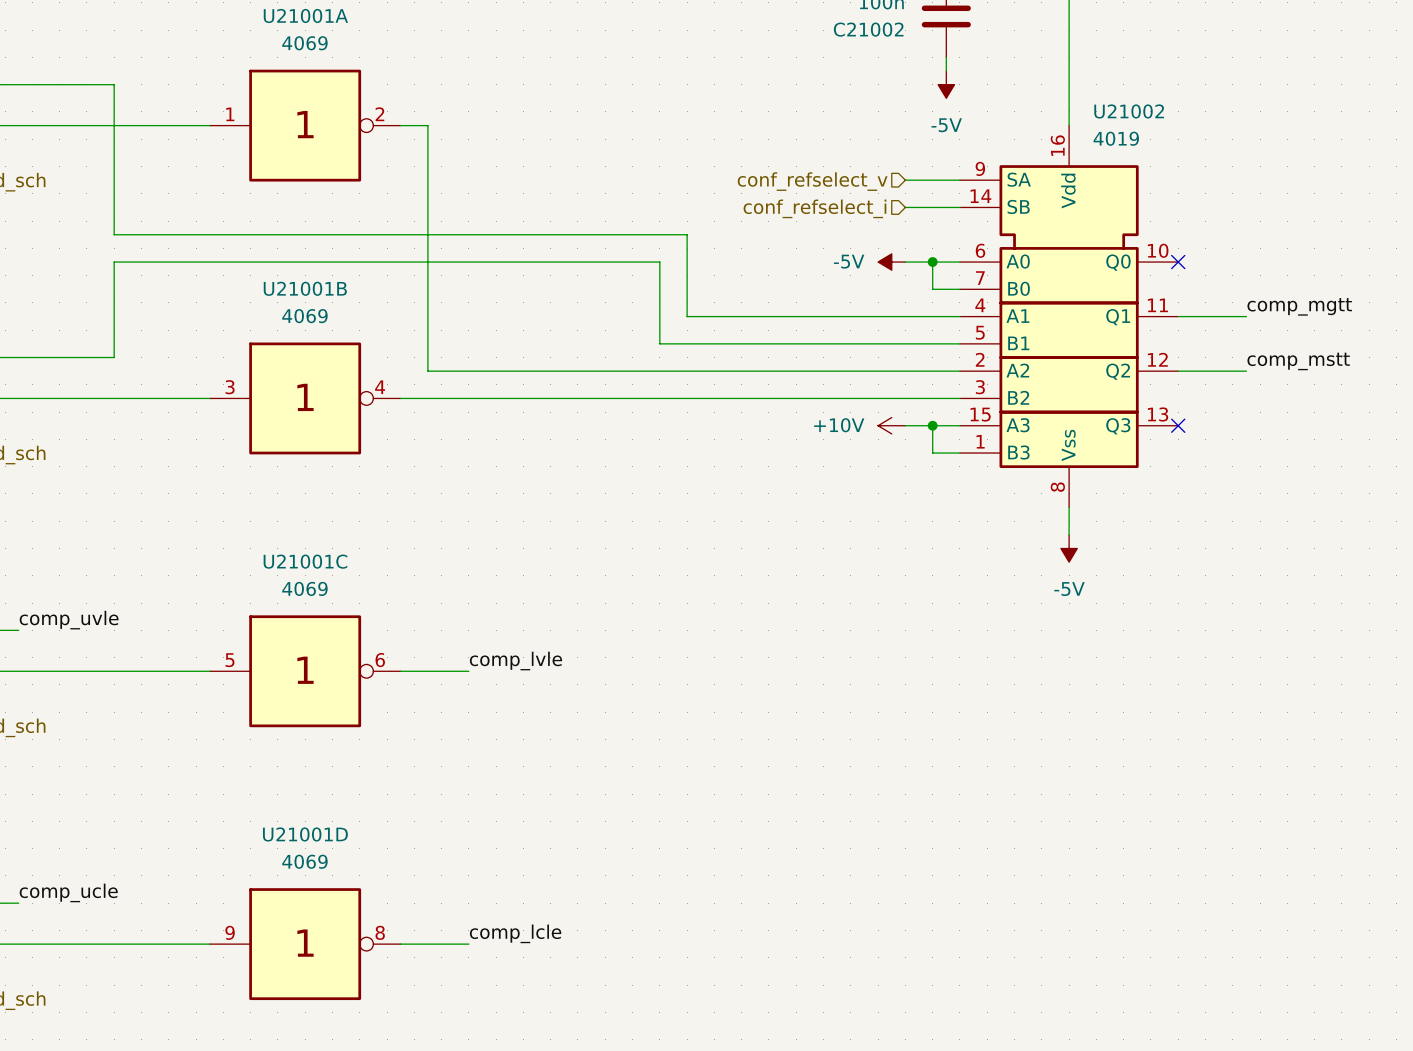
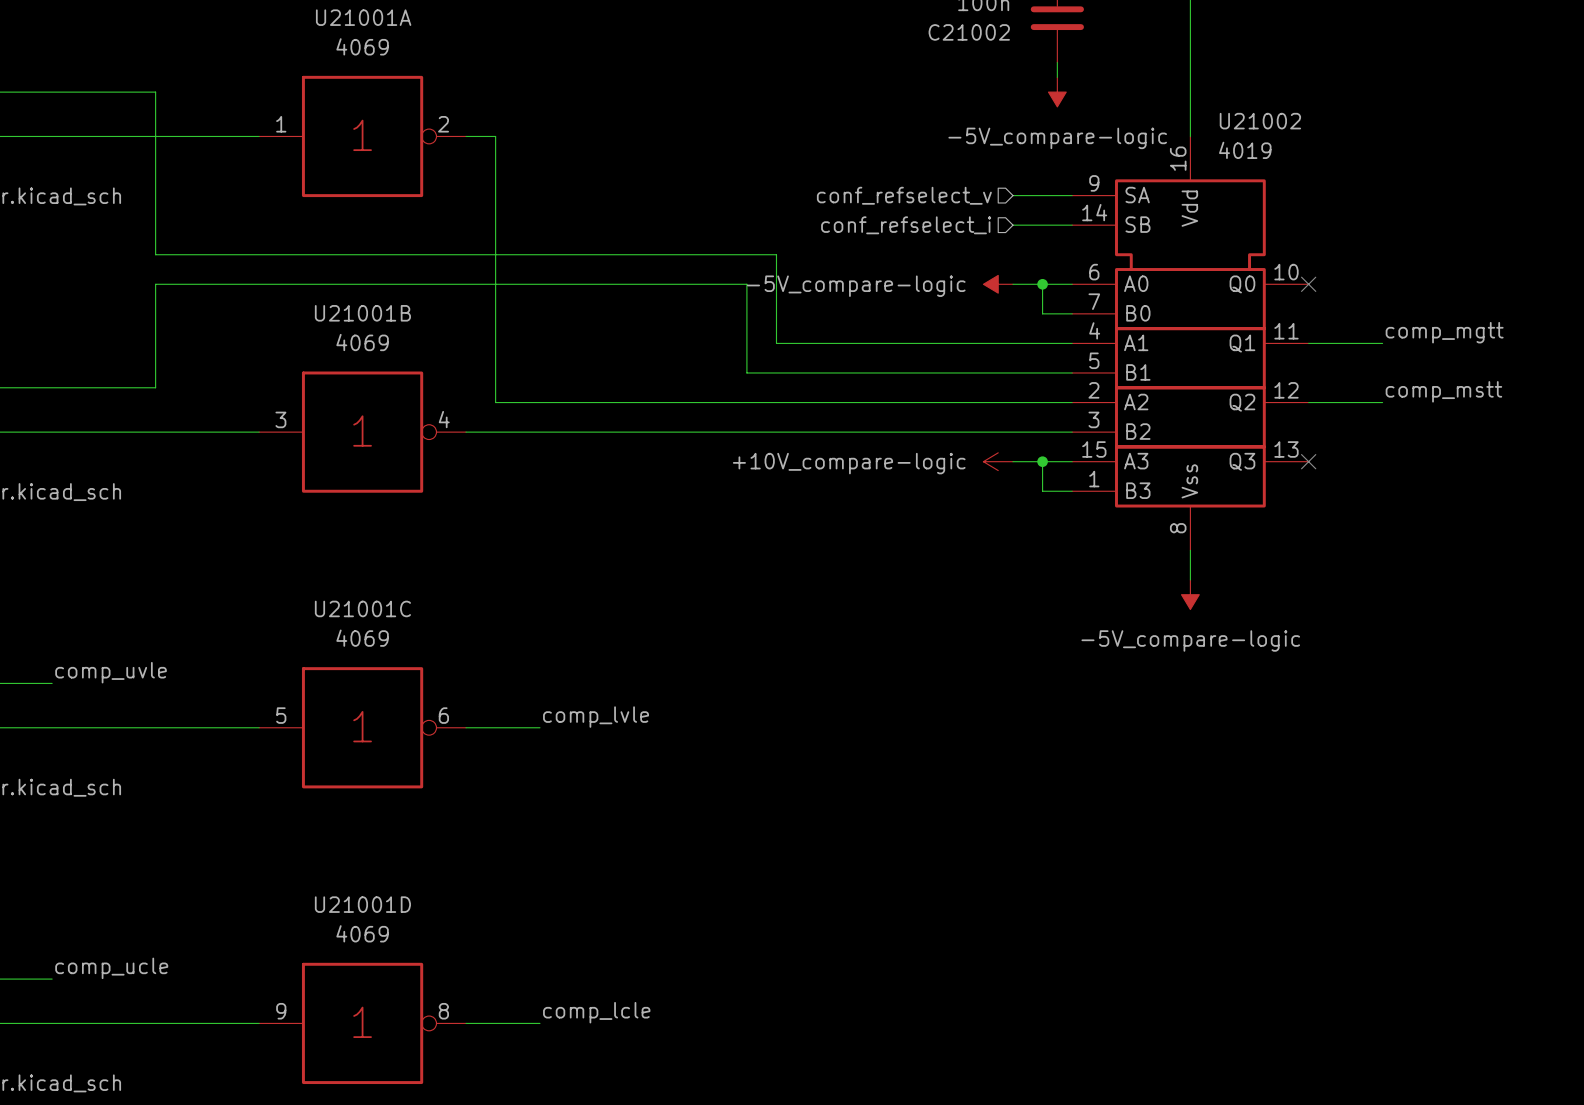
power symbol: -5V (946, 84) -> -5V_compare-logic (1057, 92)
power symbol: -5V (891, 262) -> -5V_compare-logic (998, 284)
power symbol: +10V (891, 425) -> +10V_compare-logic (998, 461)
power symbol: -5V (1069, 548) -> -5V_compare-logic (1190, 594)

